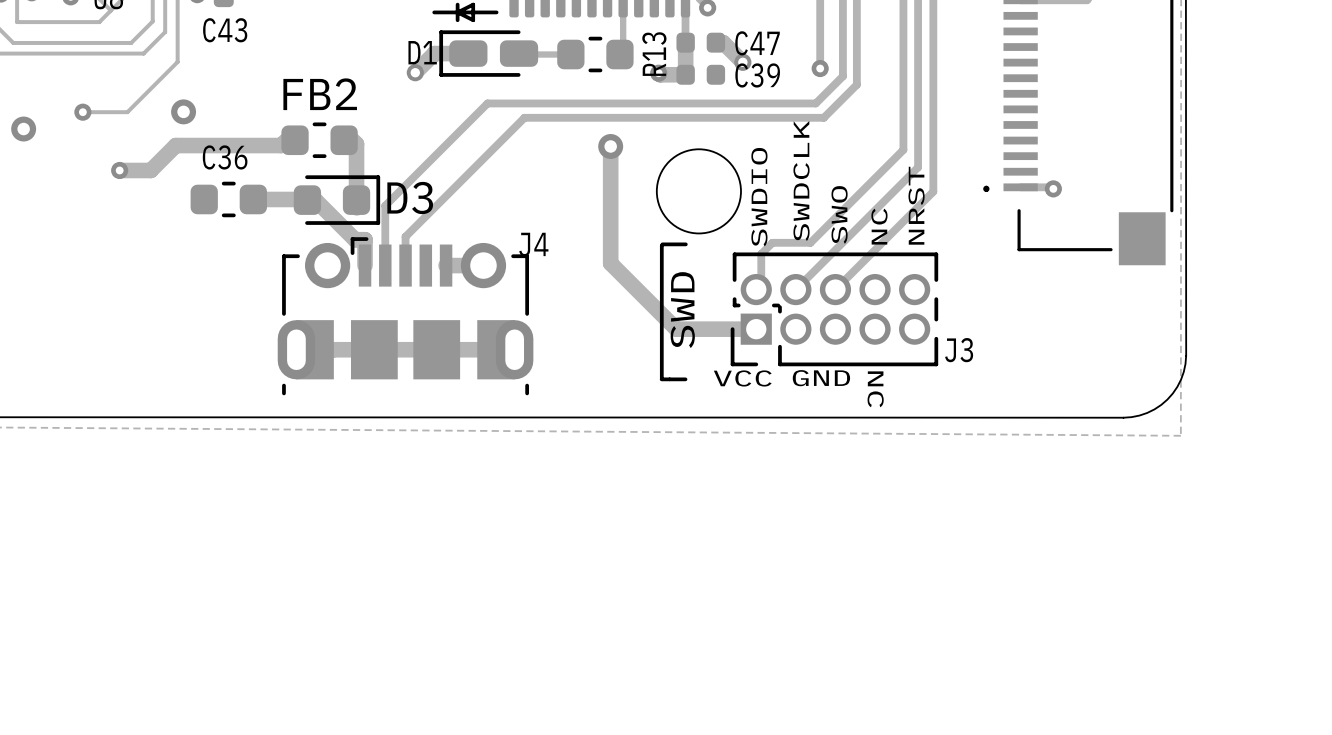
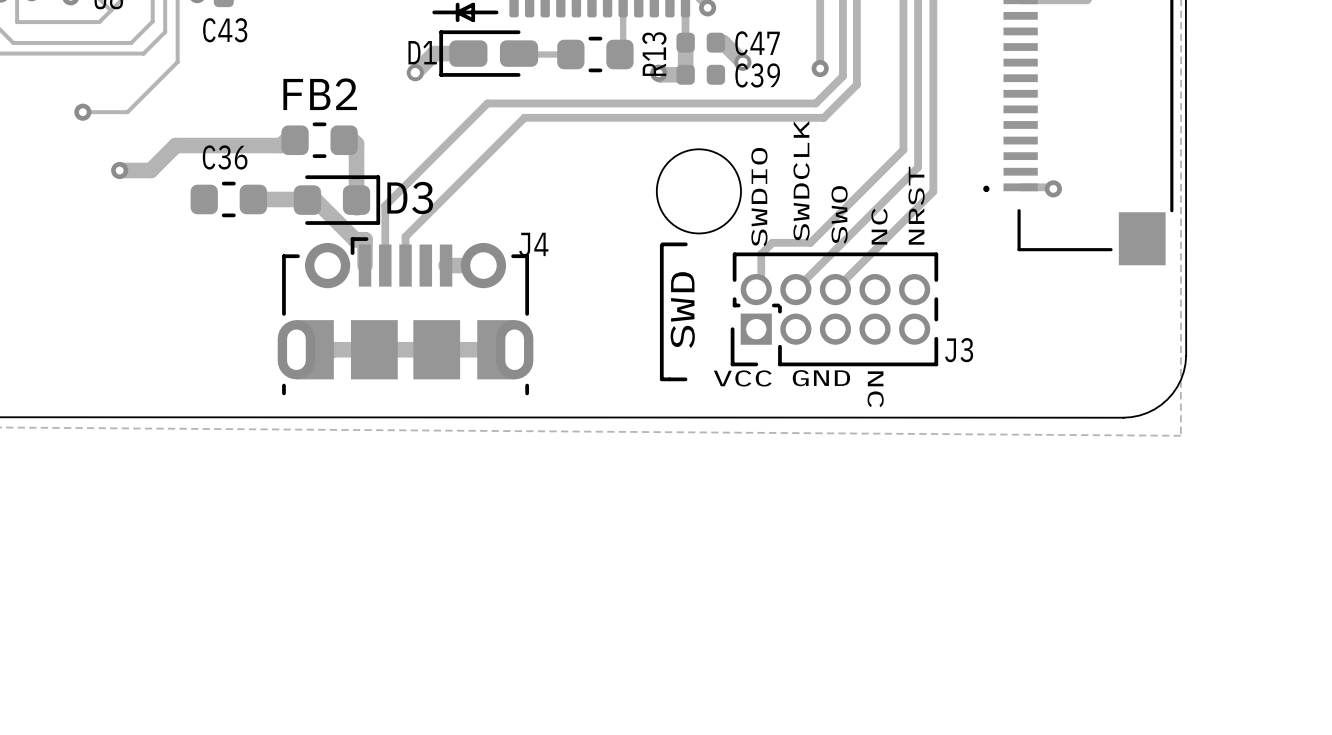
via: (183, 111) -> none
via: (23, 129) -> none
track: (610, 146) (610, 263) (676, 329) (756, 329) -> none
via: (610, 146) -> none

